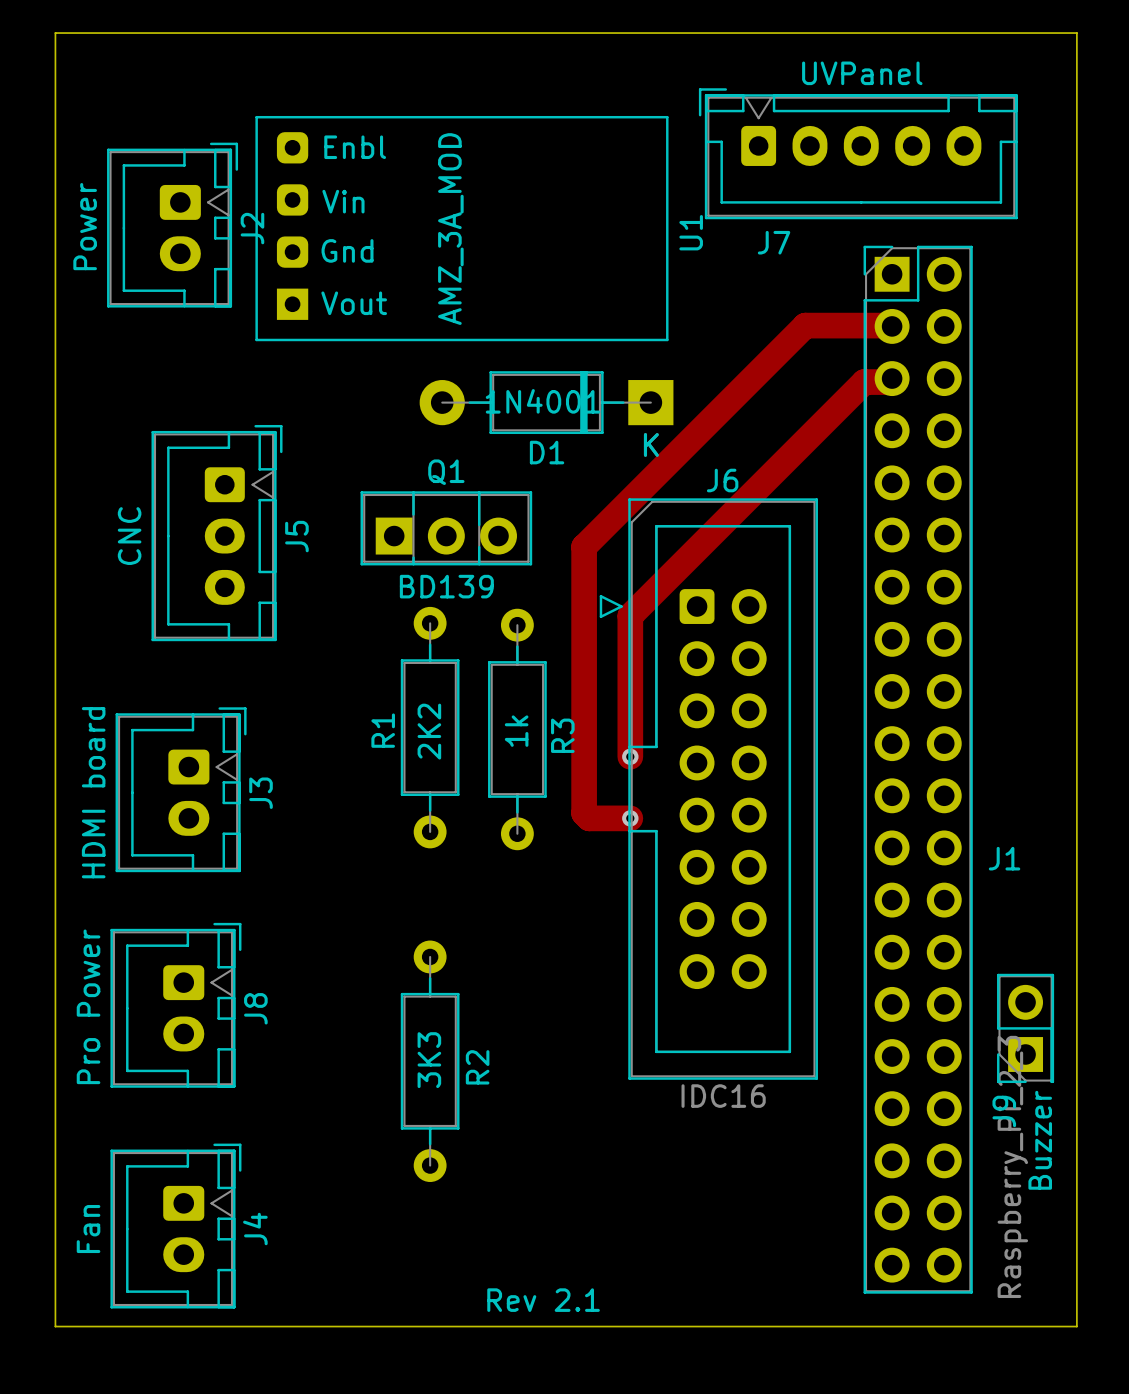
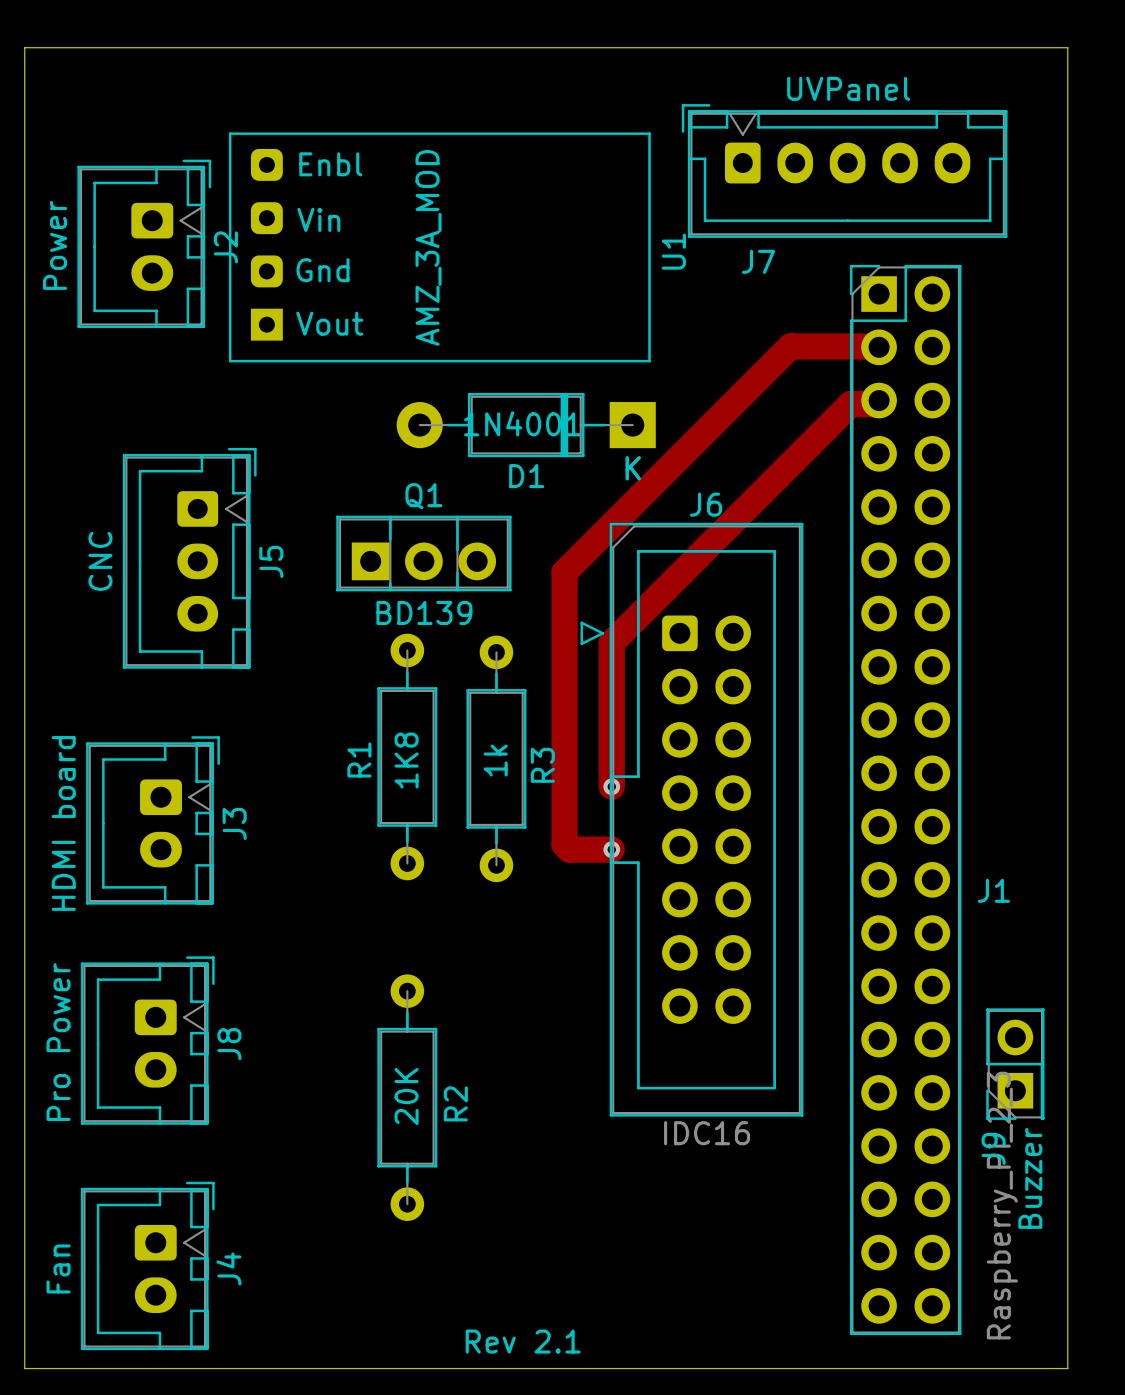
R1 value: 2K2 (429, 731) -> 1K8 (406, 760)
R2 value: 3K3 (429, 1060) -> 20K (406, 1096)

